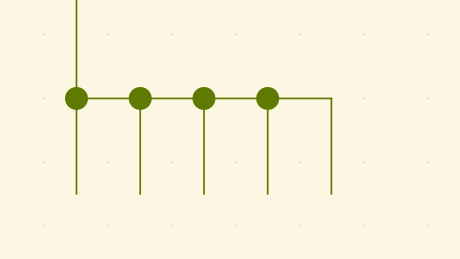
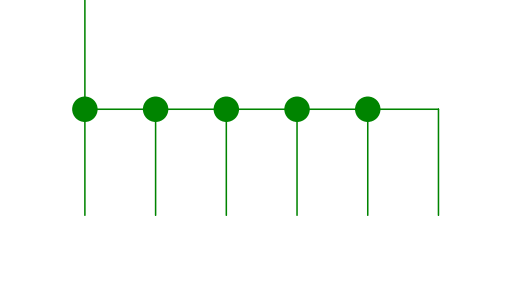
wire: none -> (367, 109) (438, 109) (438, 215)
junction: none -> (367, 109)

